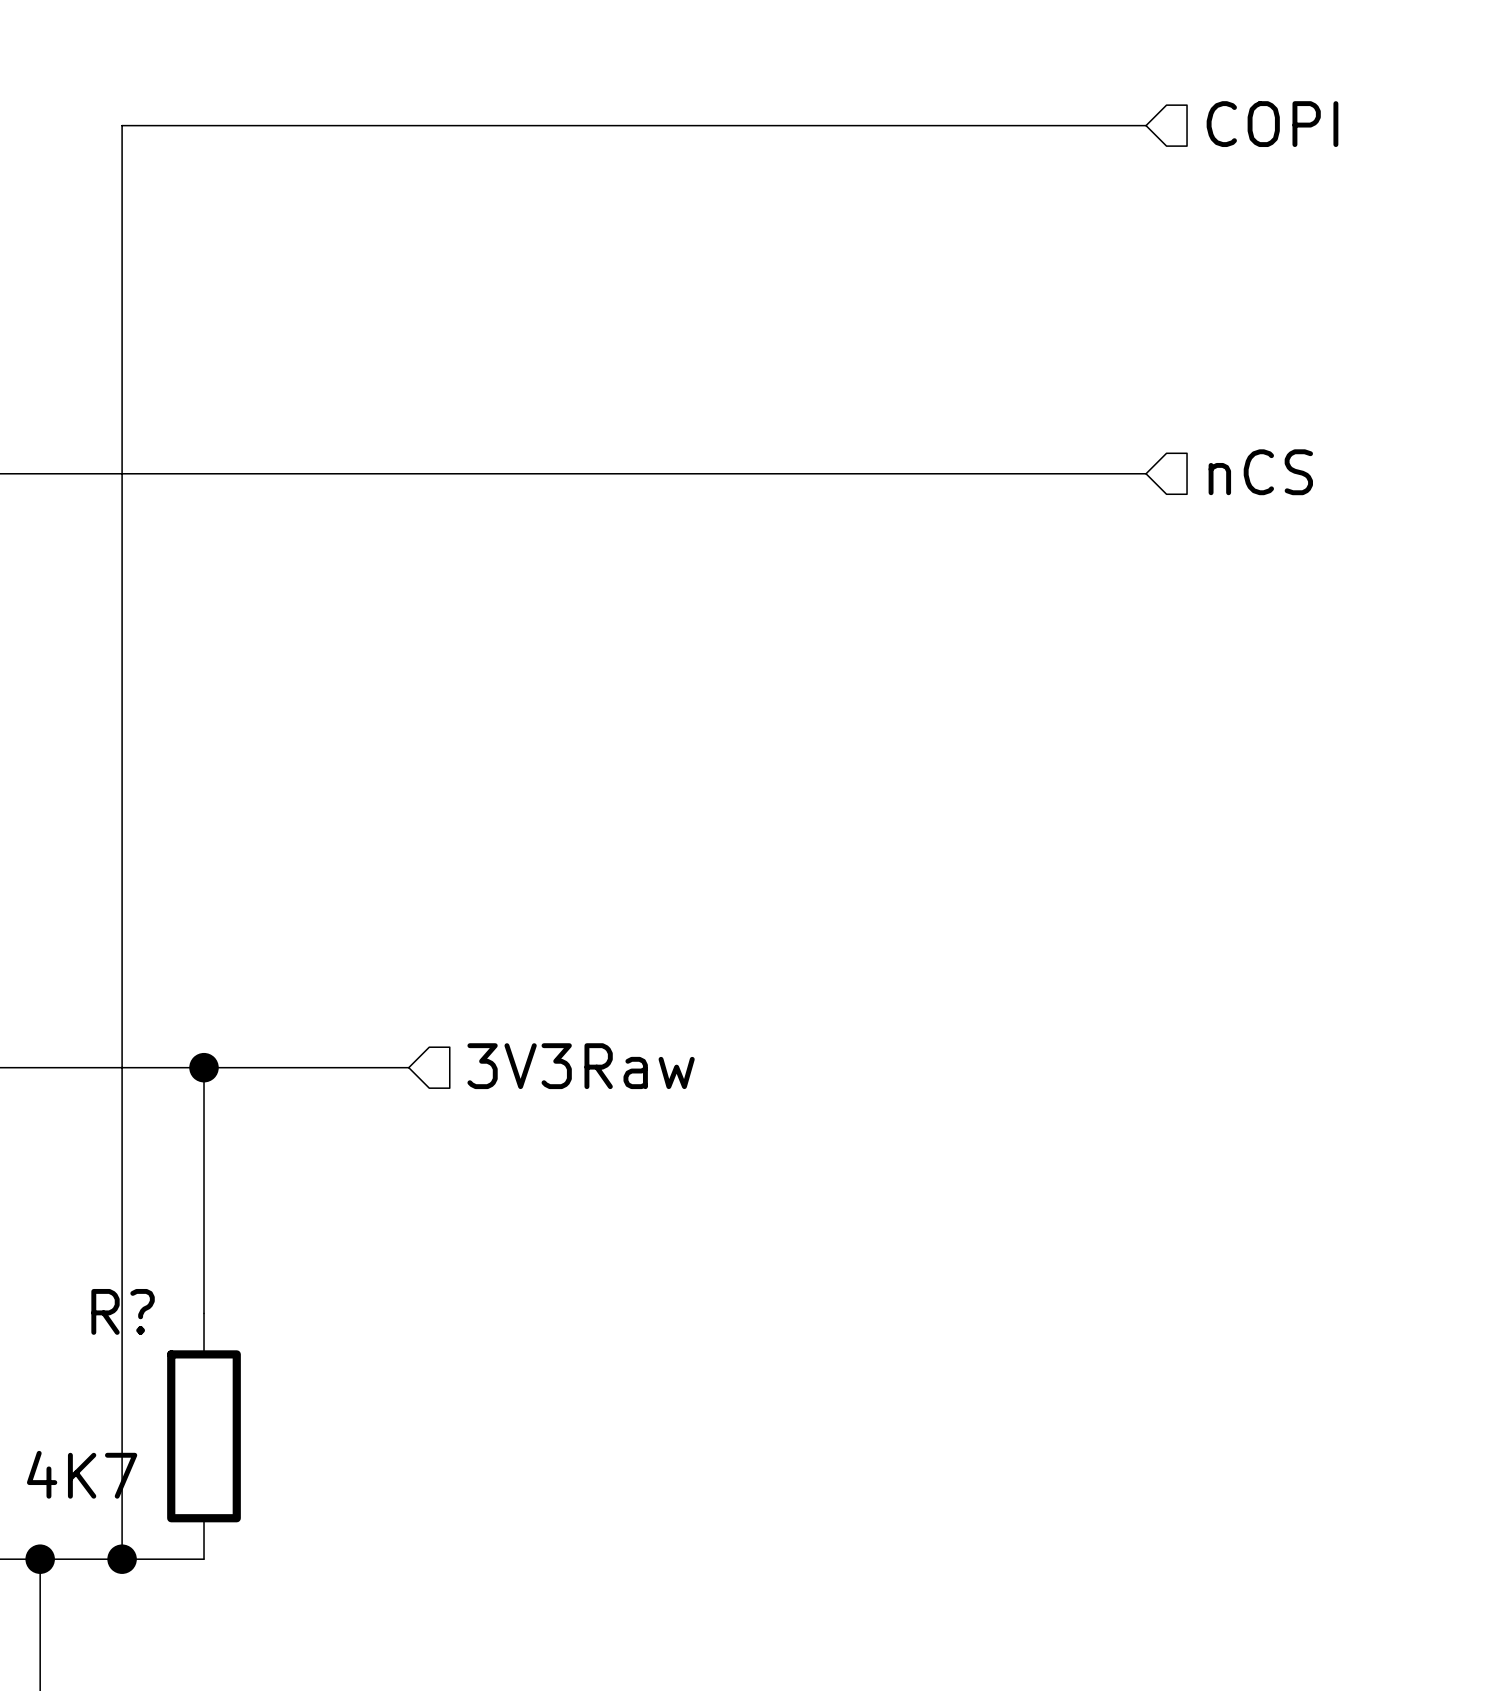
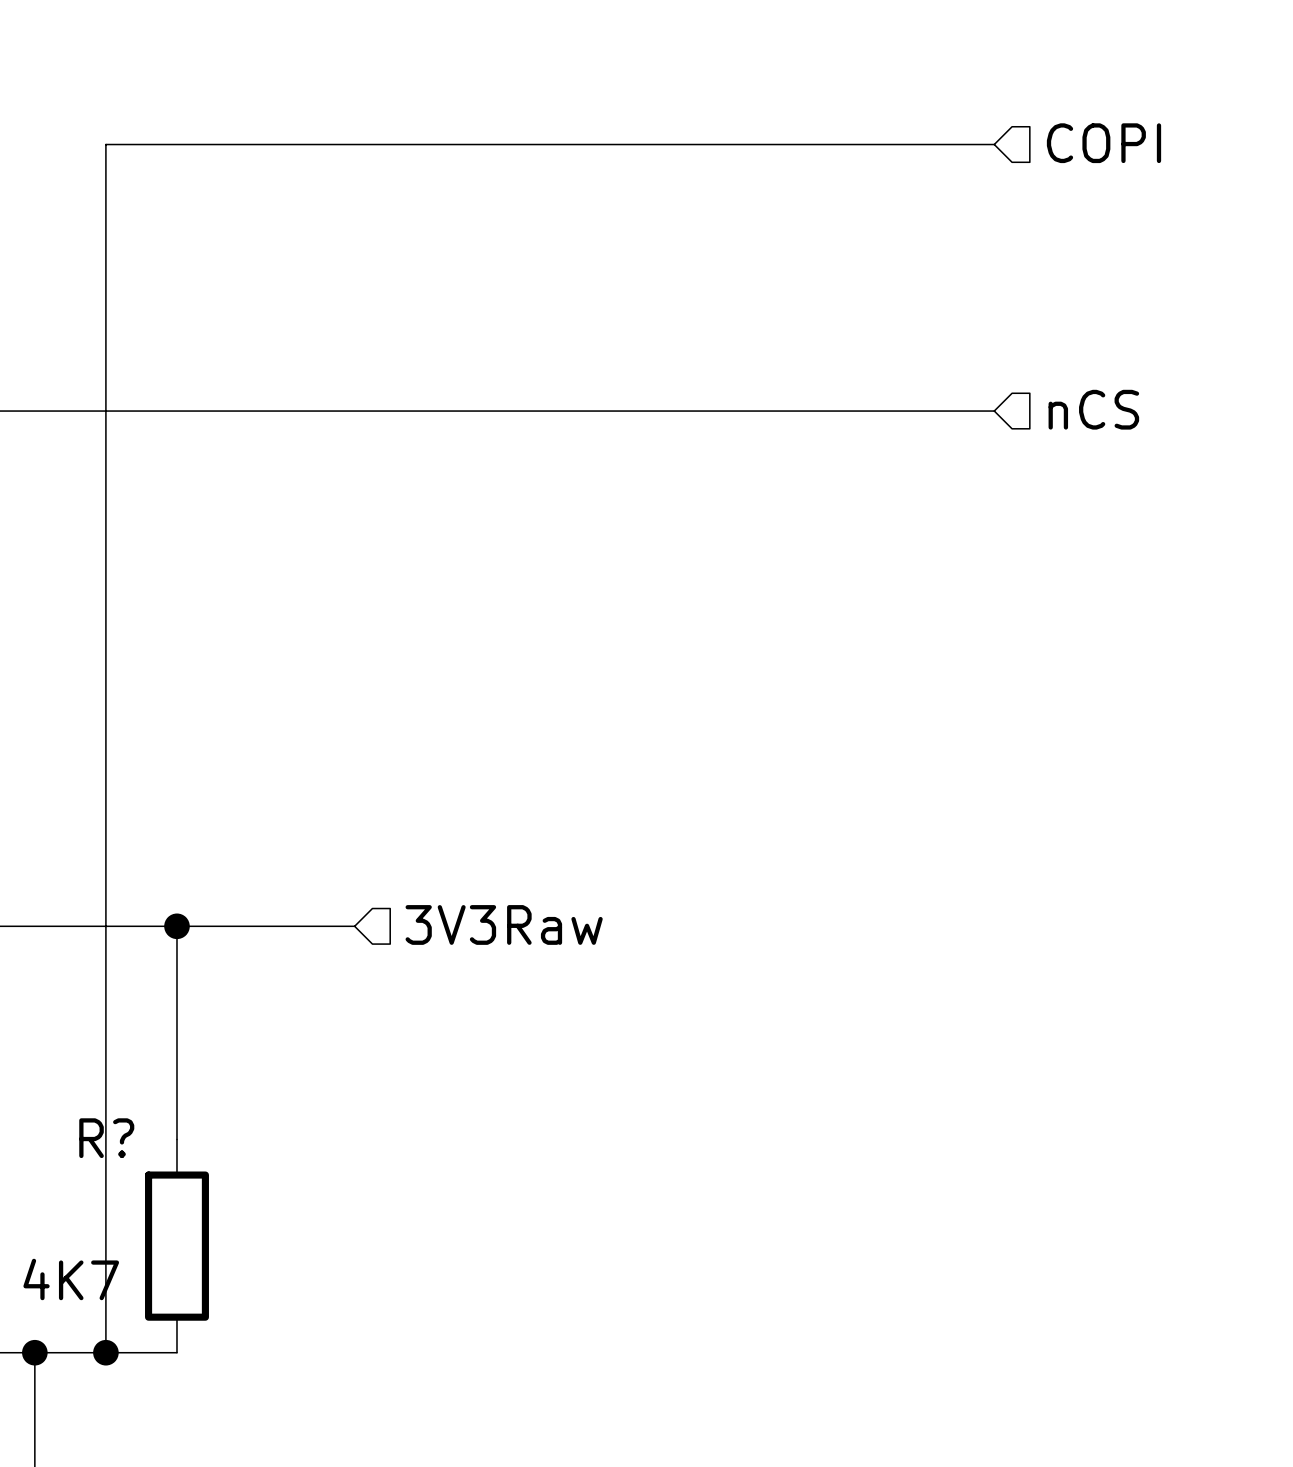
hierarchical label position: COPI (1272, 124) -> COPI (1104, 143)
wire: (1146, 125) (122, 125) (122, 166) -> (994, 144) (105, 144)

